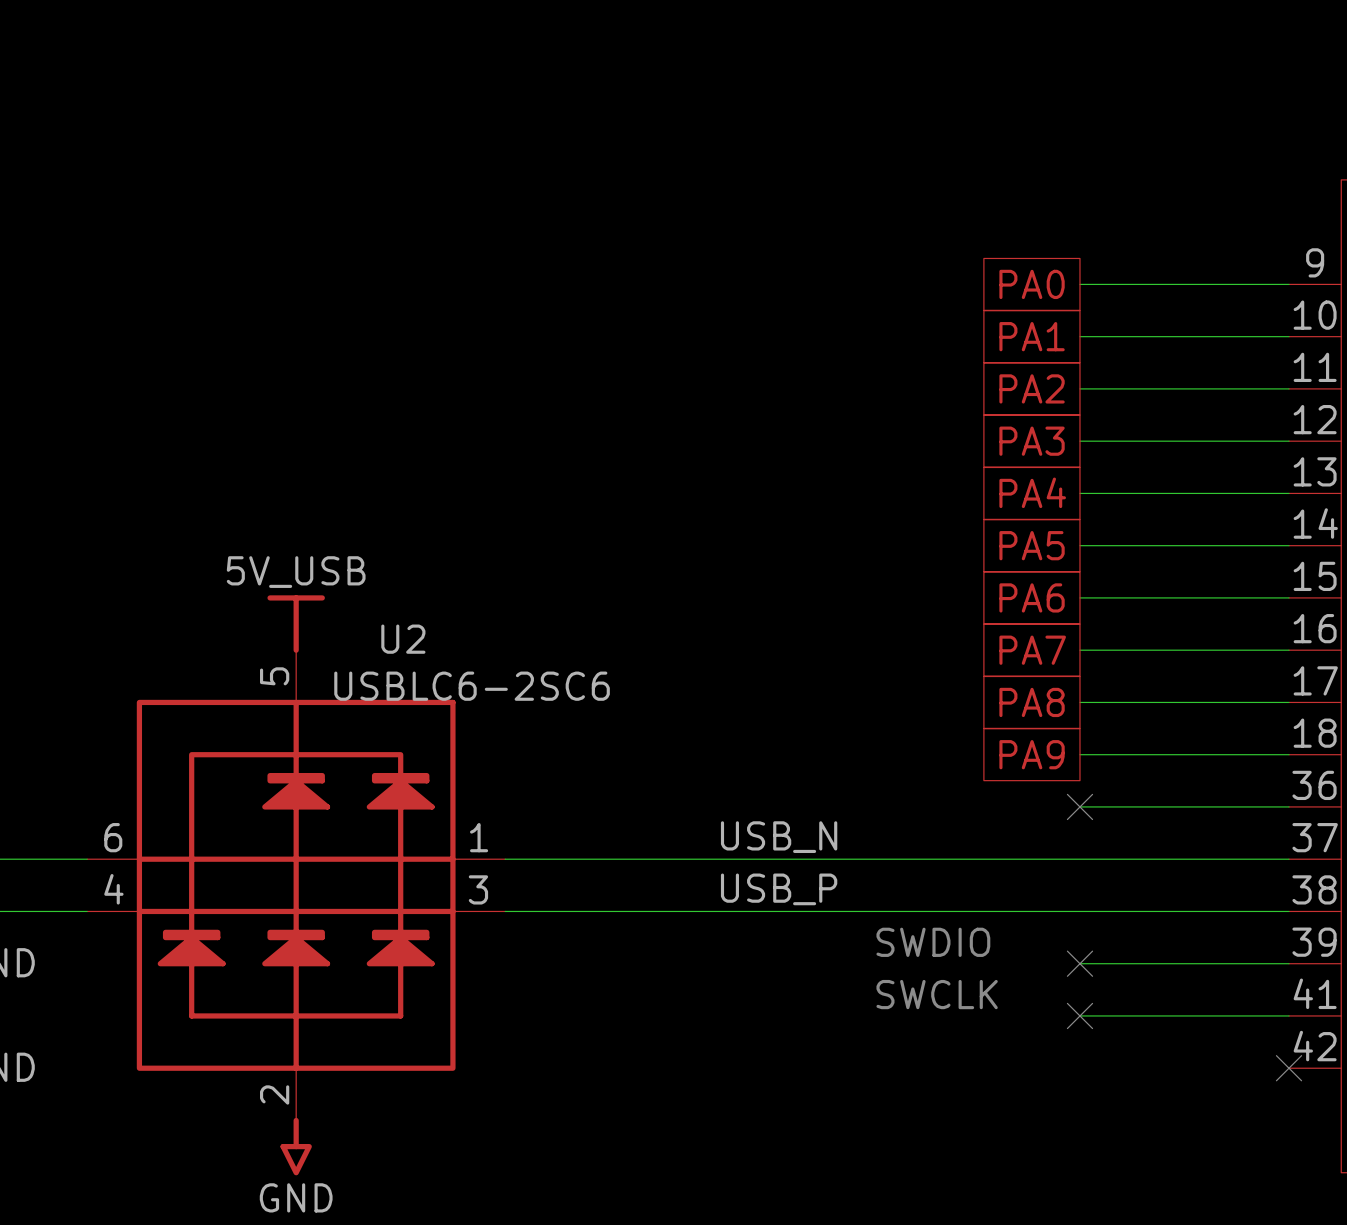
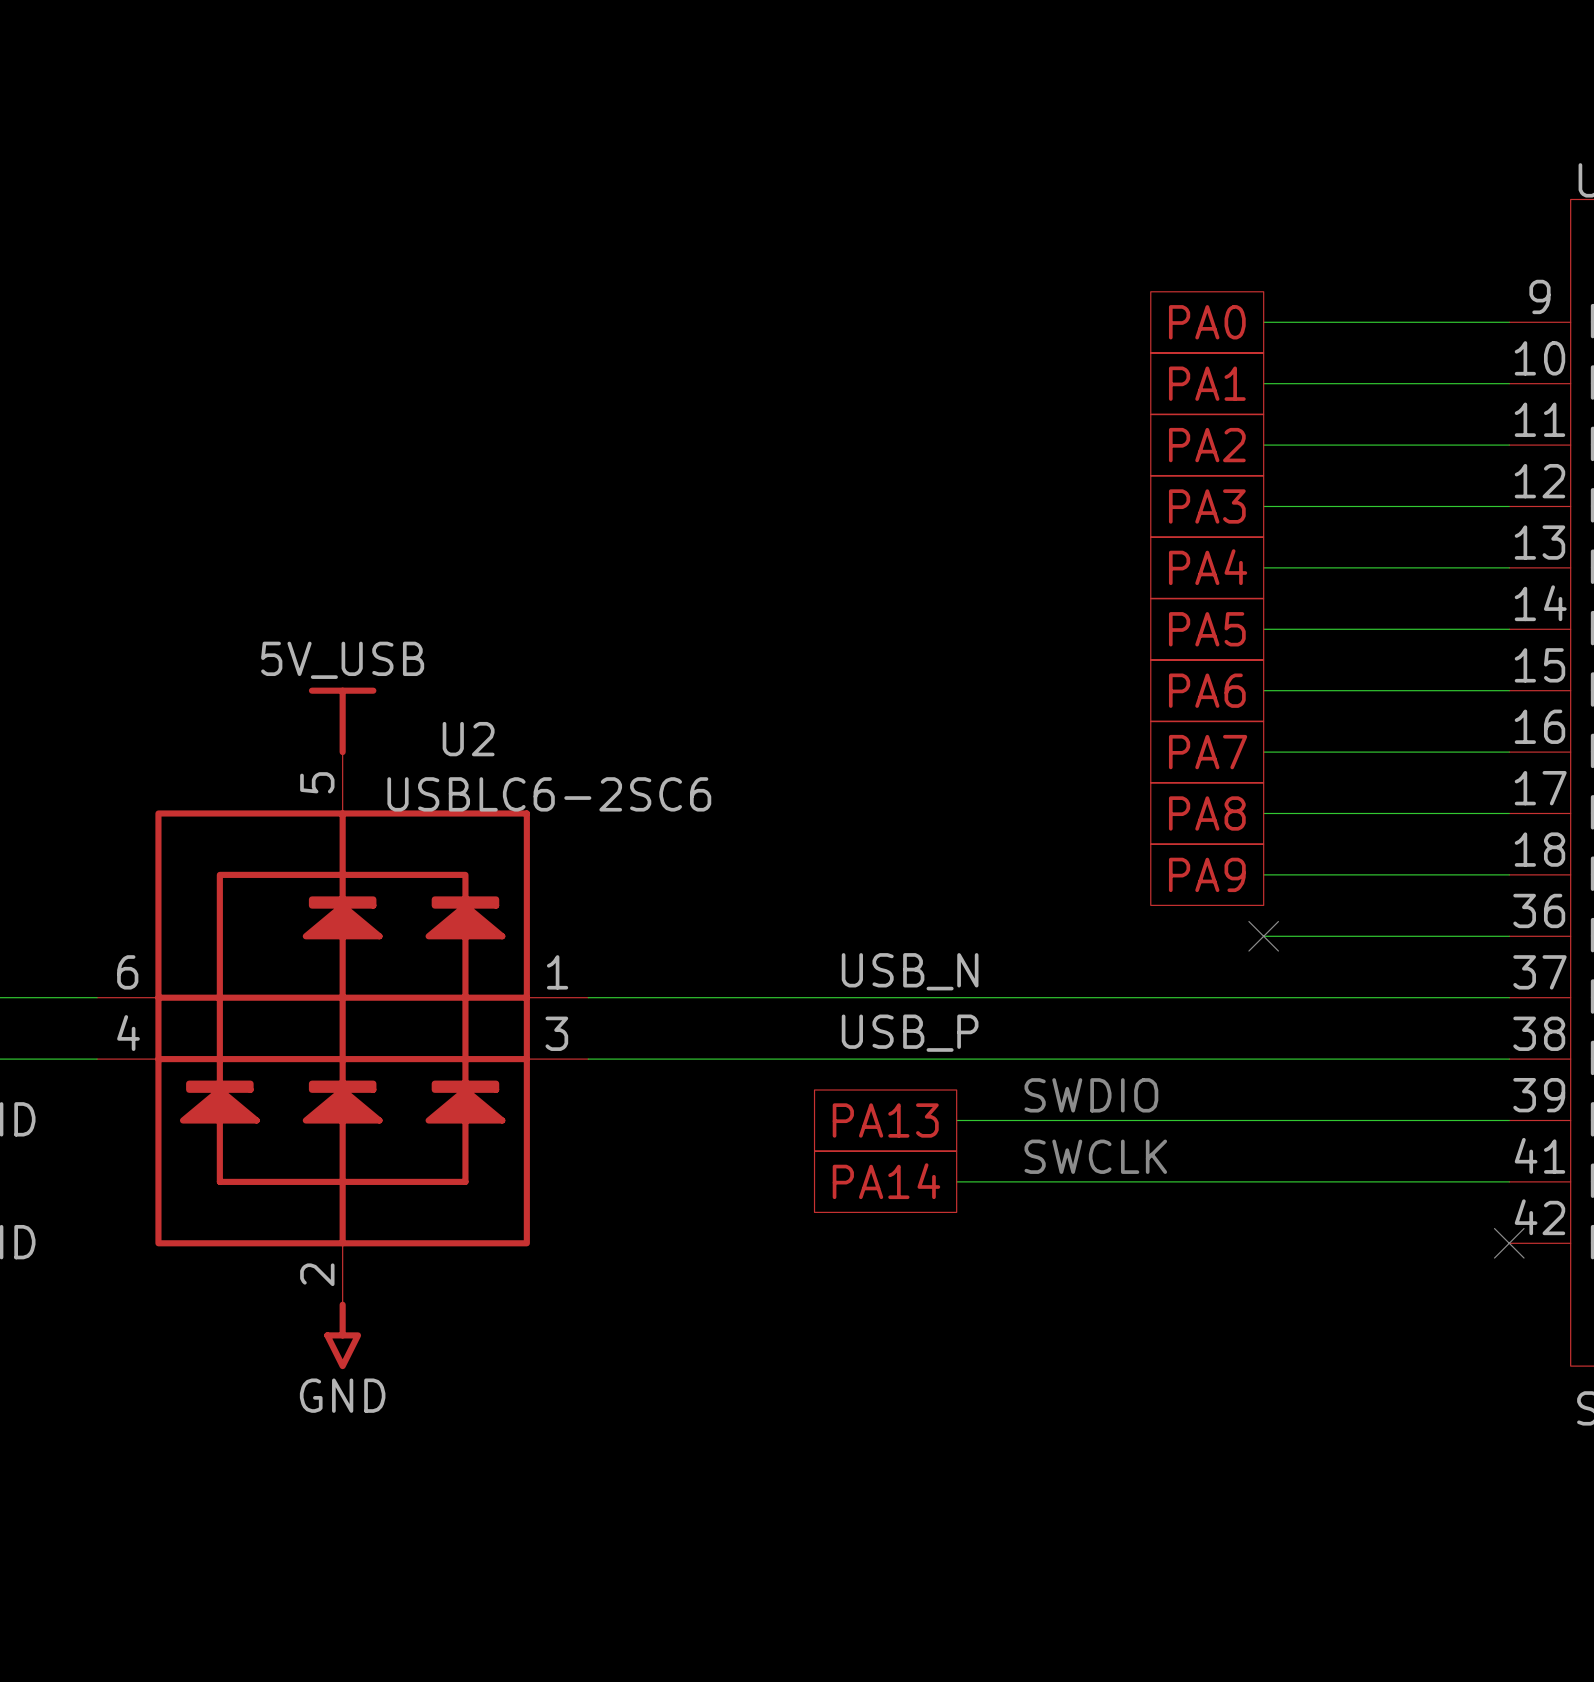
global label: none -> PA13 (885, 1120)
wire: none -> (956, 1120) (1263, 1120)
no-connect mark: (1079, 963) -> none
global label: none -> PA14 (886, 1181)
wire: none -> (956, 1181) (1263, 1181)
no-connect mark: (1079, 1015) -> none

